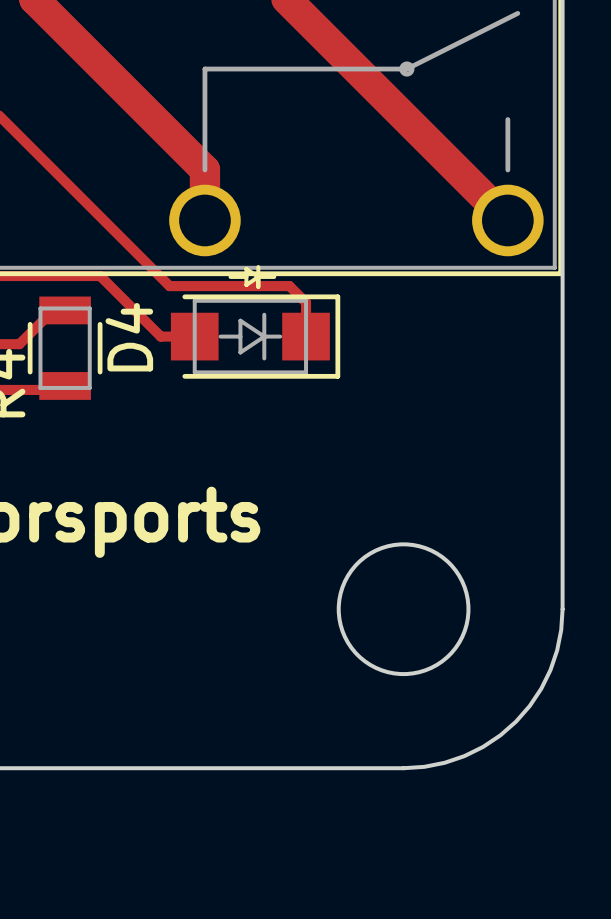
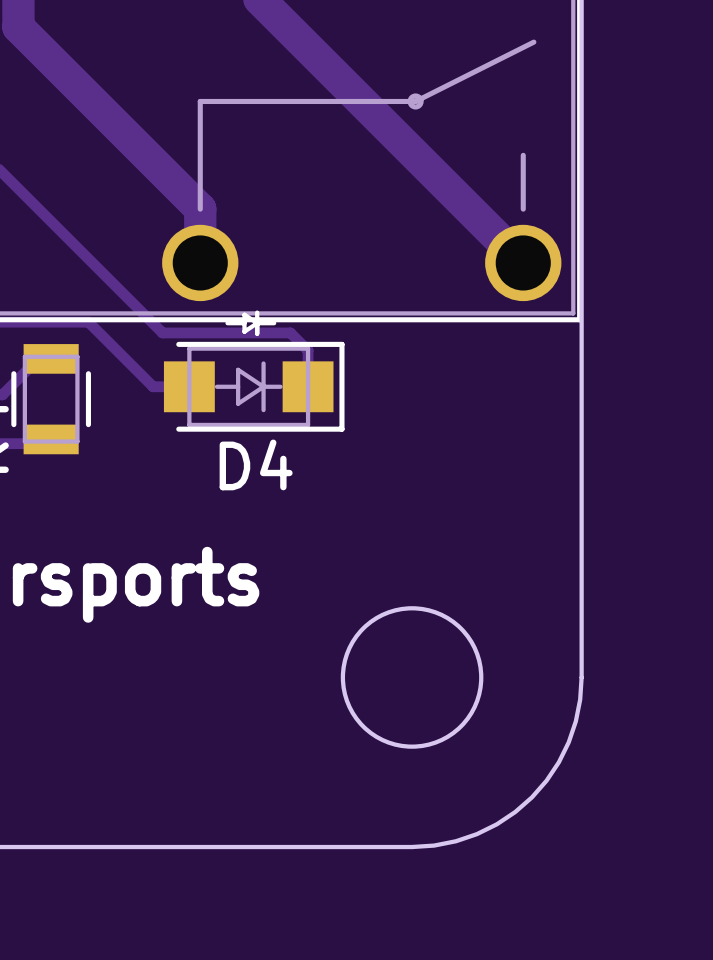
D4 name rotation: 0° (129, 337) -> 90° clockwise (256, 464)
D4 name position: D4 (129, 337) -> D4 (256, 464)

